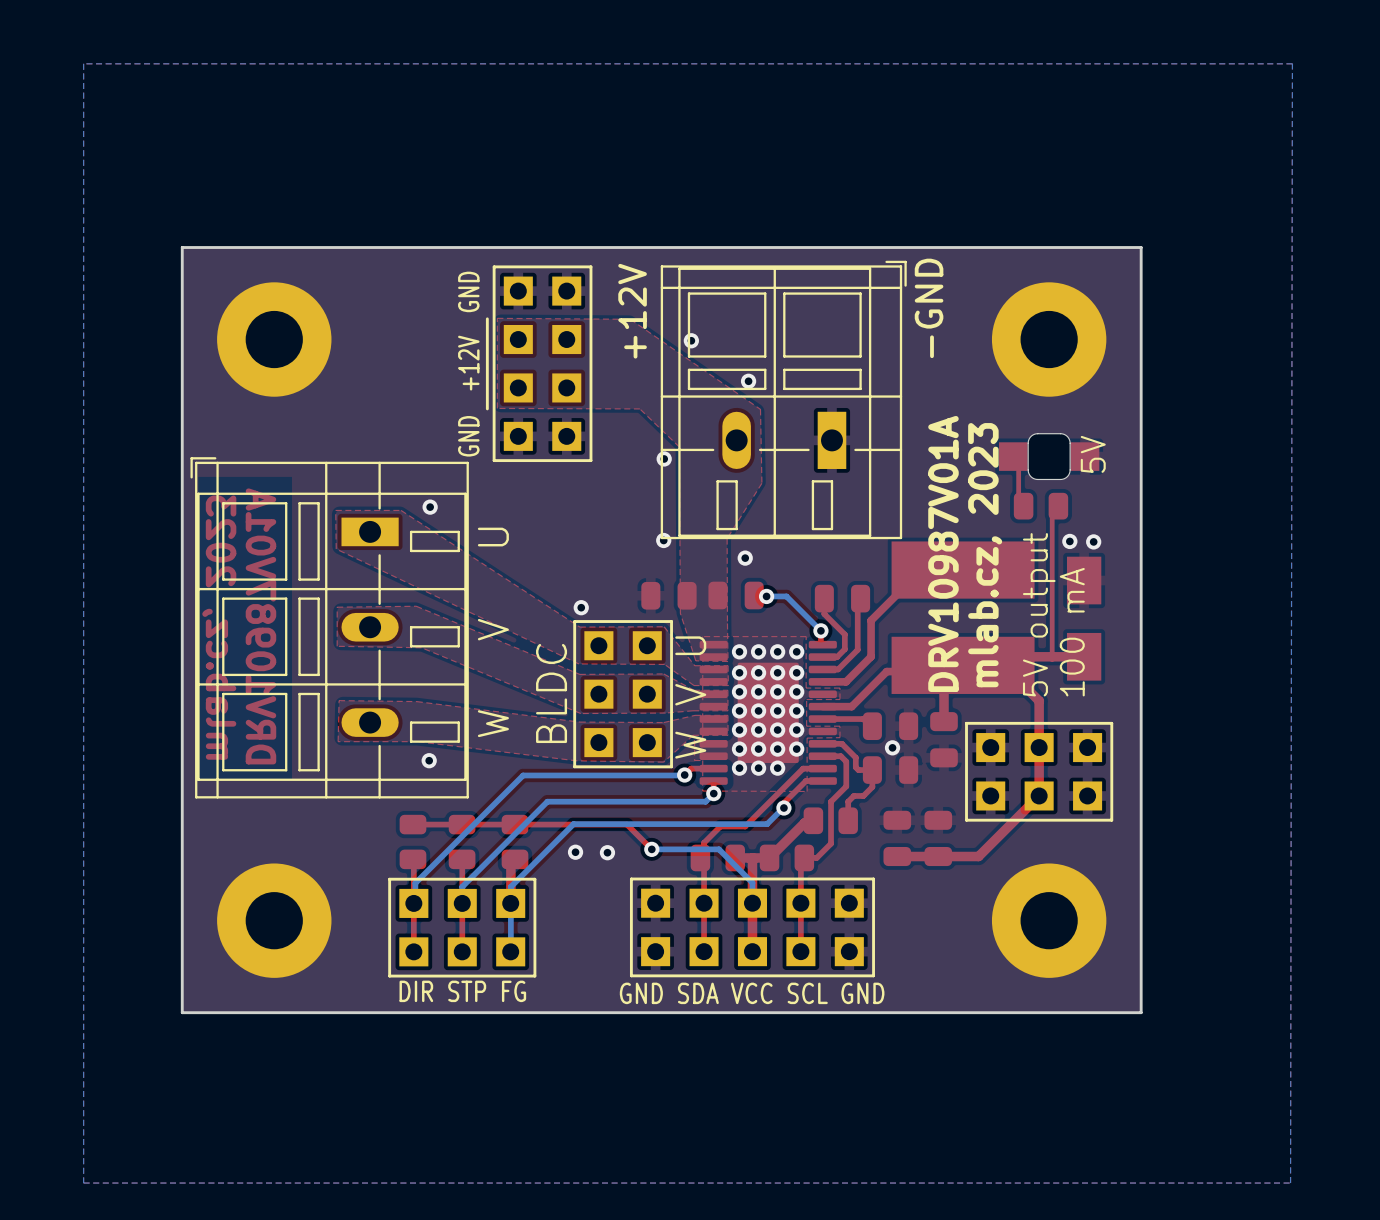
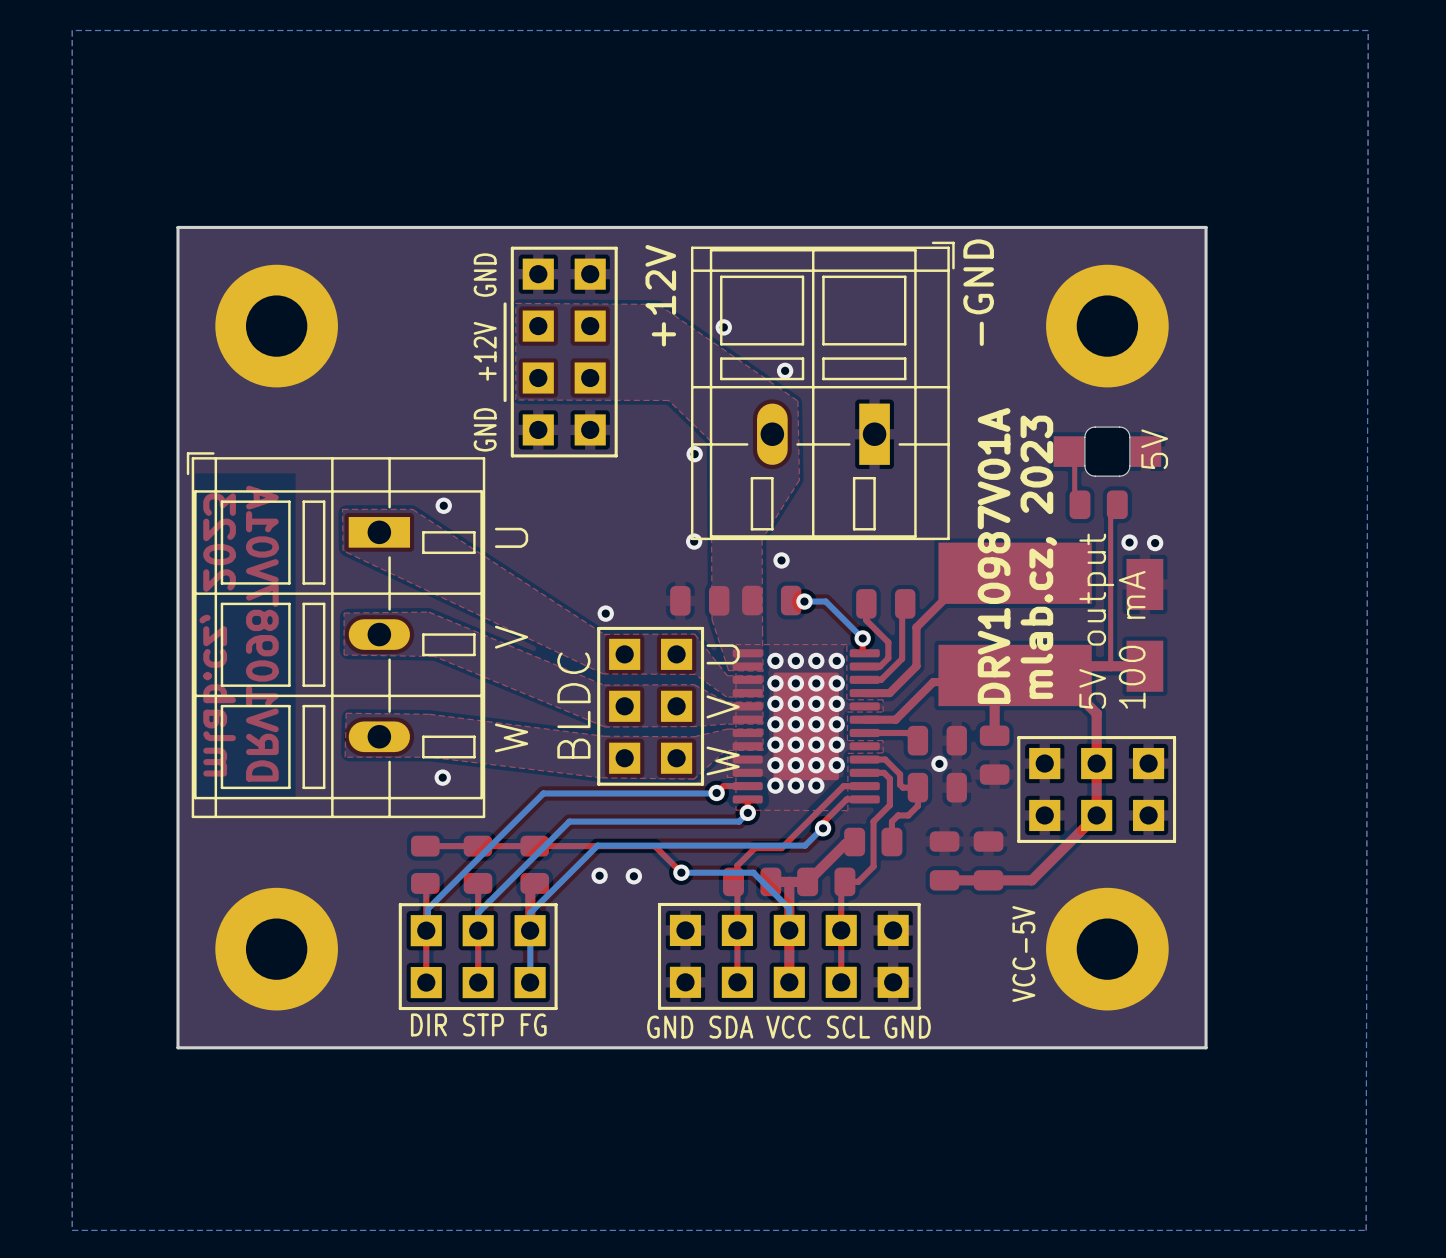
text: none -> VCC-5V (1023, 954)

